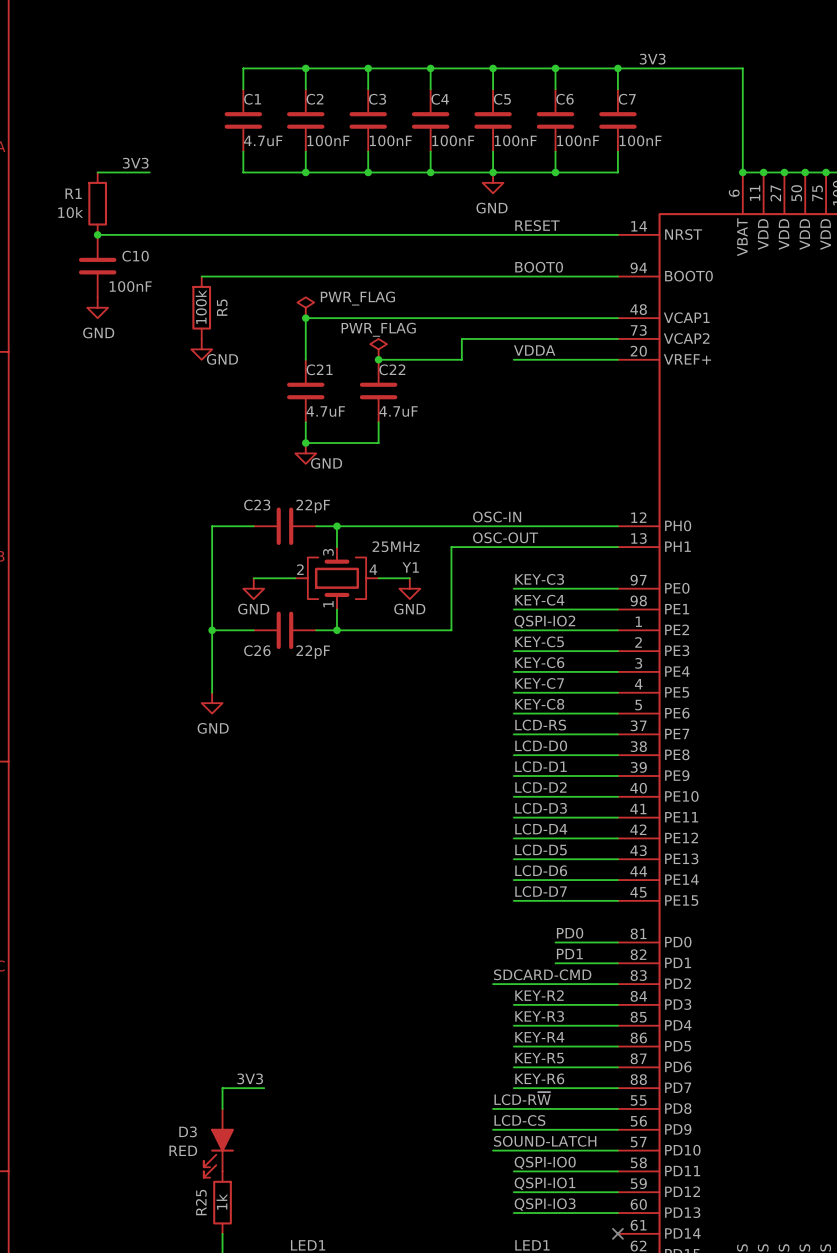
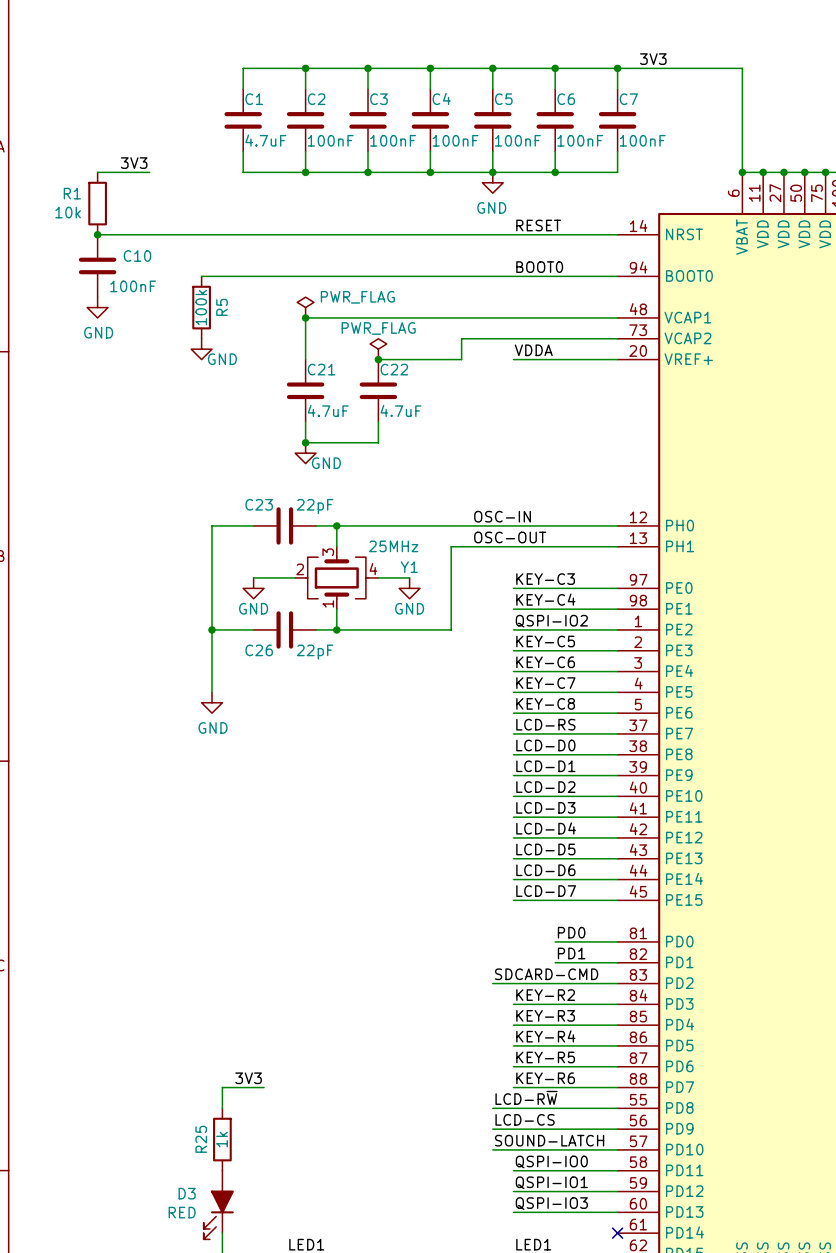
D3 position: (218, 1143) -> (218, 1205)
R25 position: (222, 1202) -> (222, 1139)

